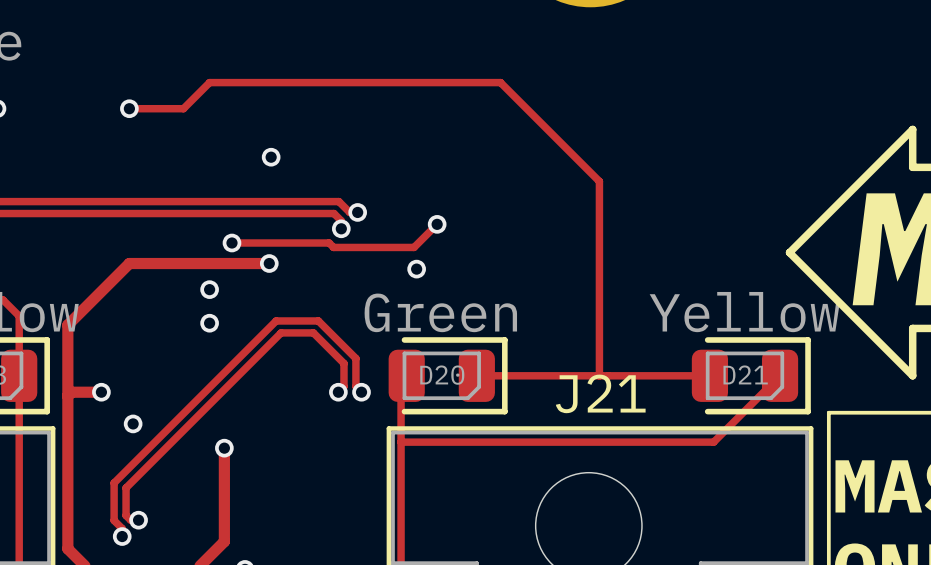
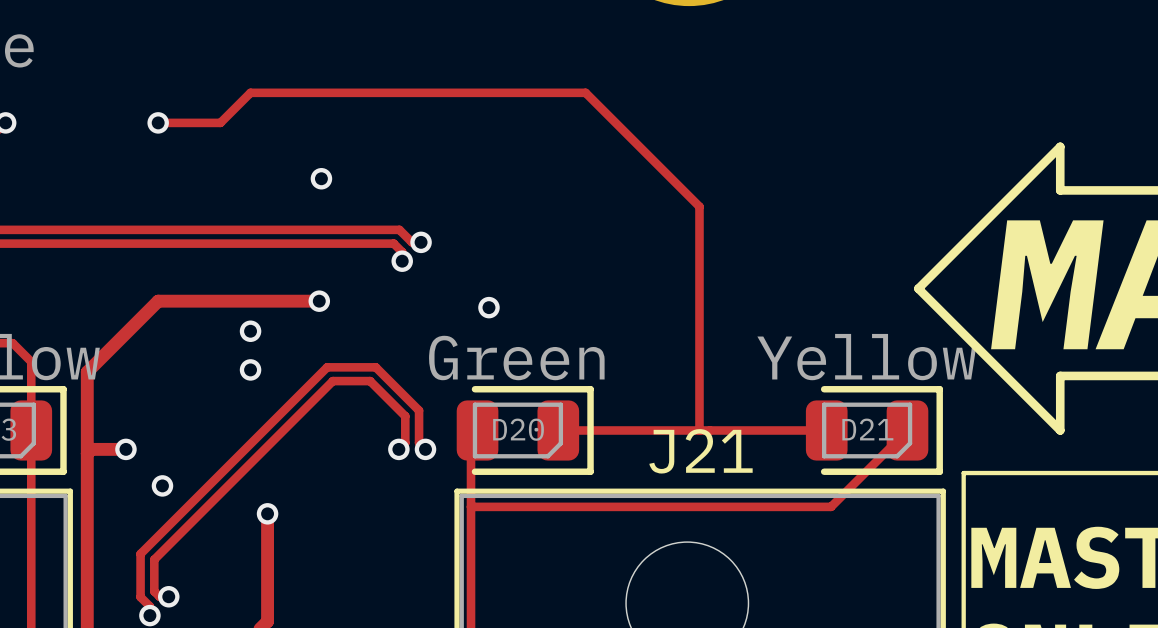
track: (437, 224) (414, 247) (333, 247) (329, 243) (231, 243) -> none
via: (437, 224) -> none
via: (231, 243) -> none

